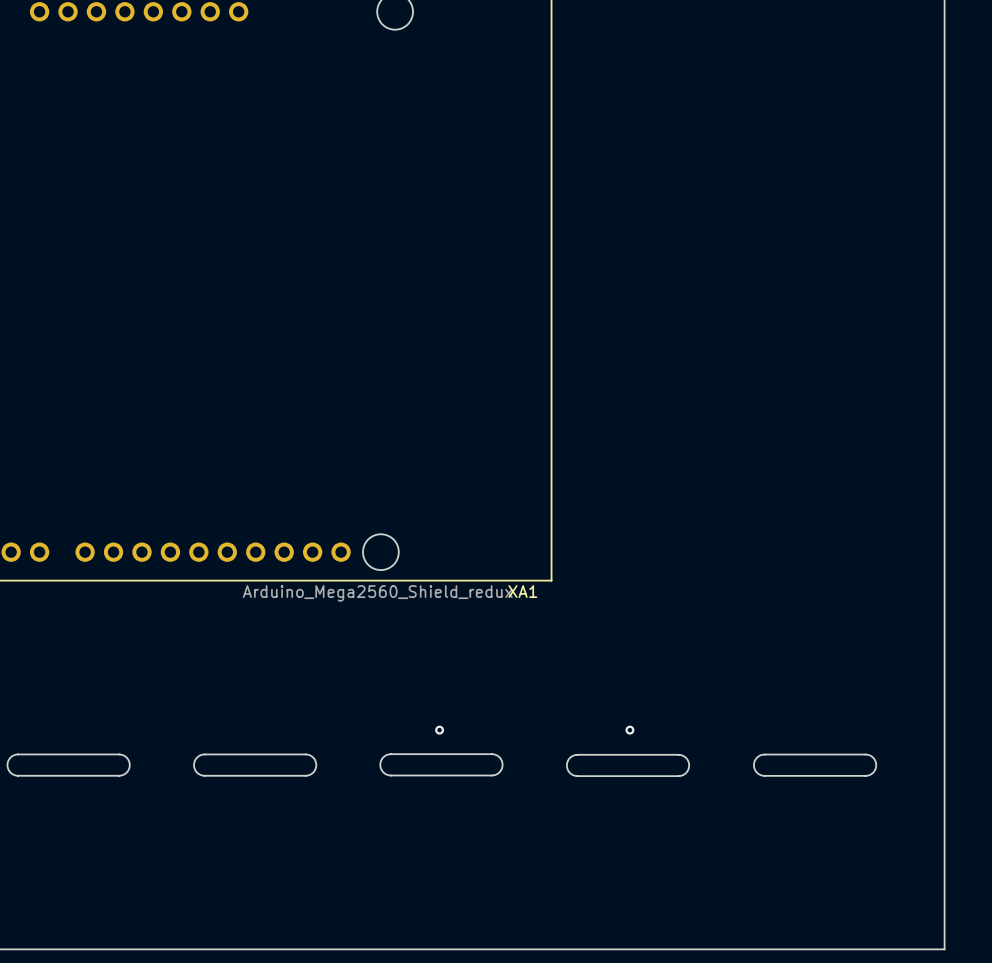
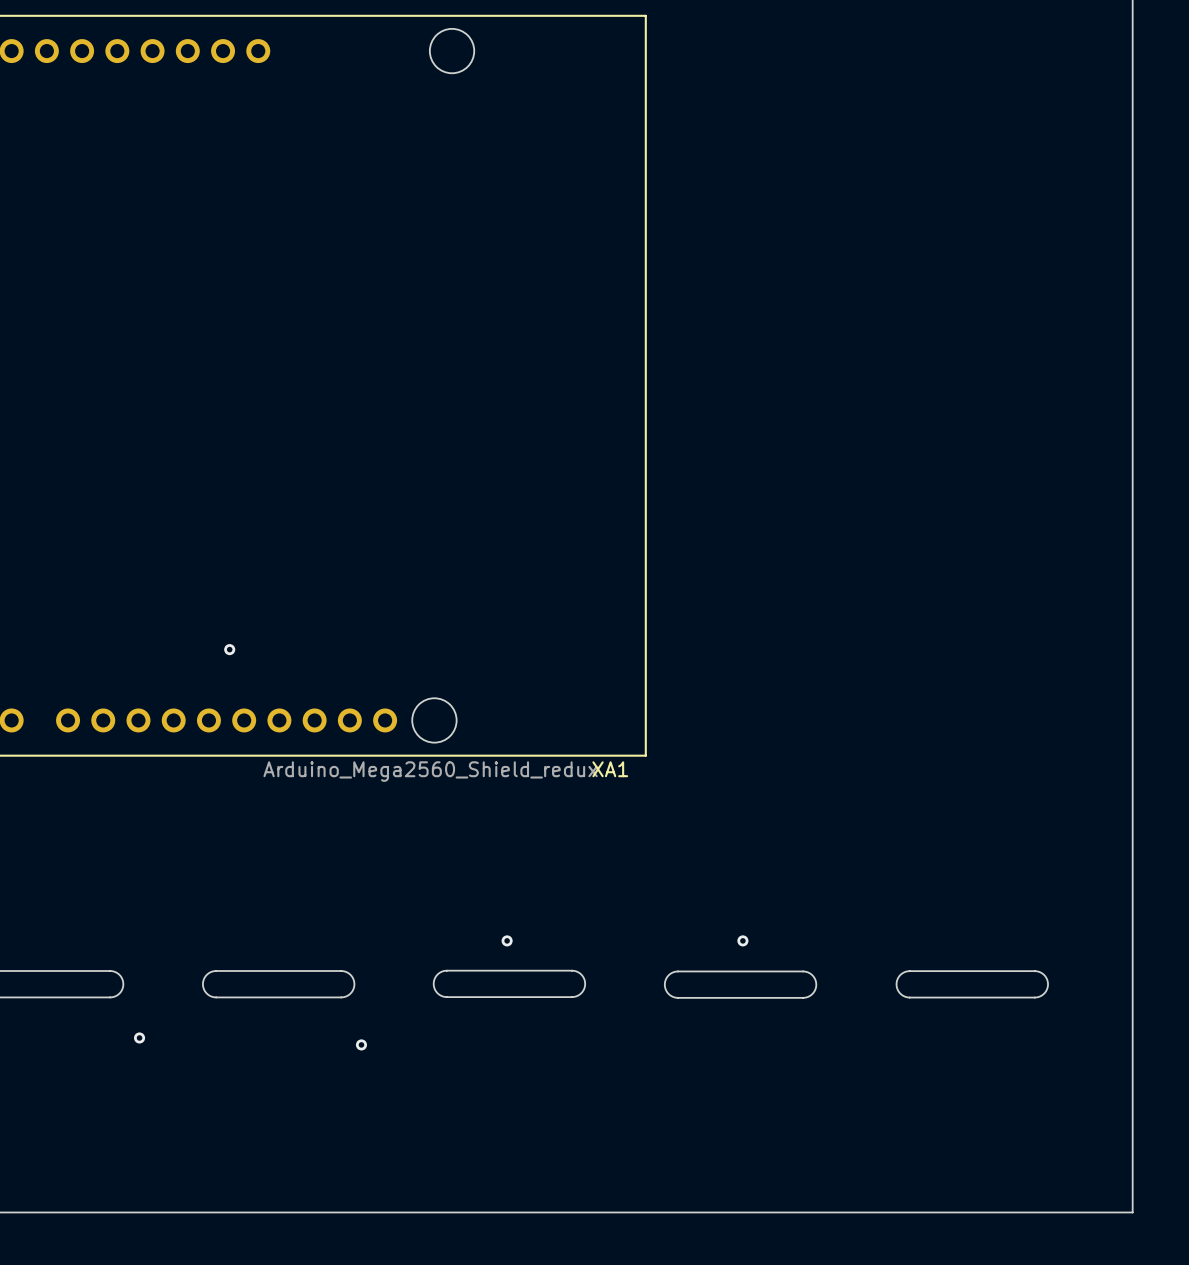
via: none -> (229, 649)
via: none -> (139, 1037)
via: none -> (361, 1044)

